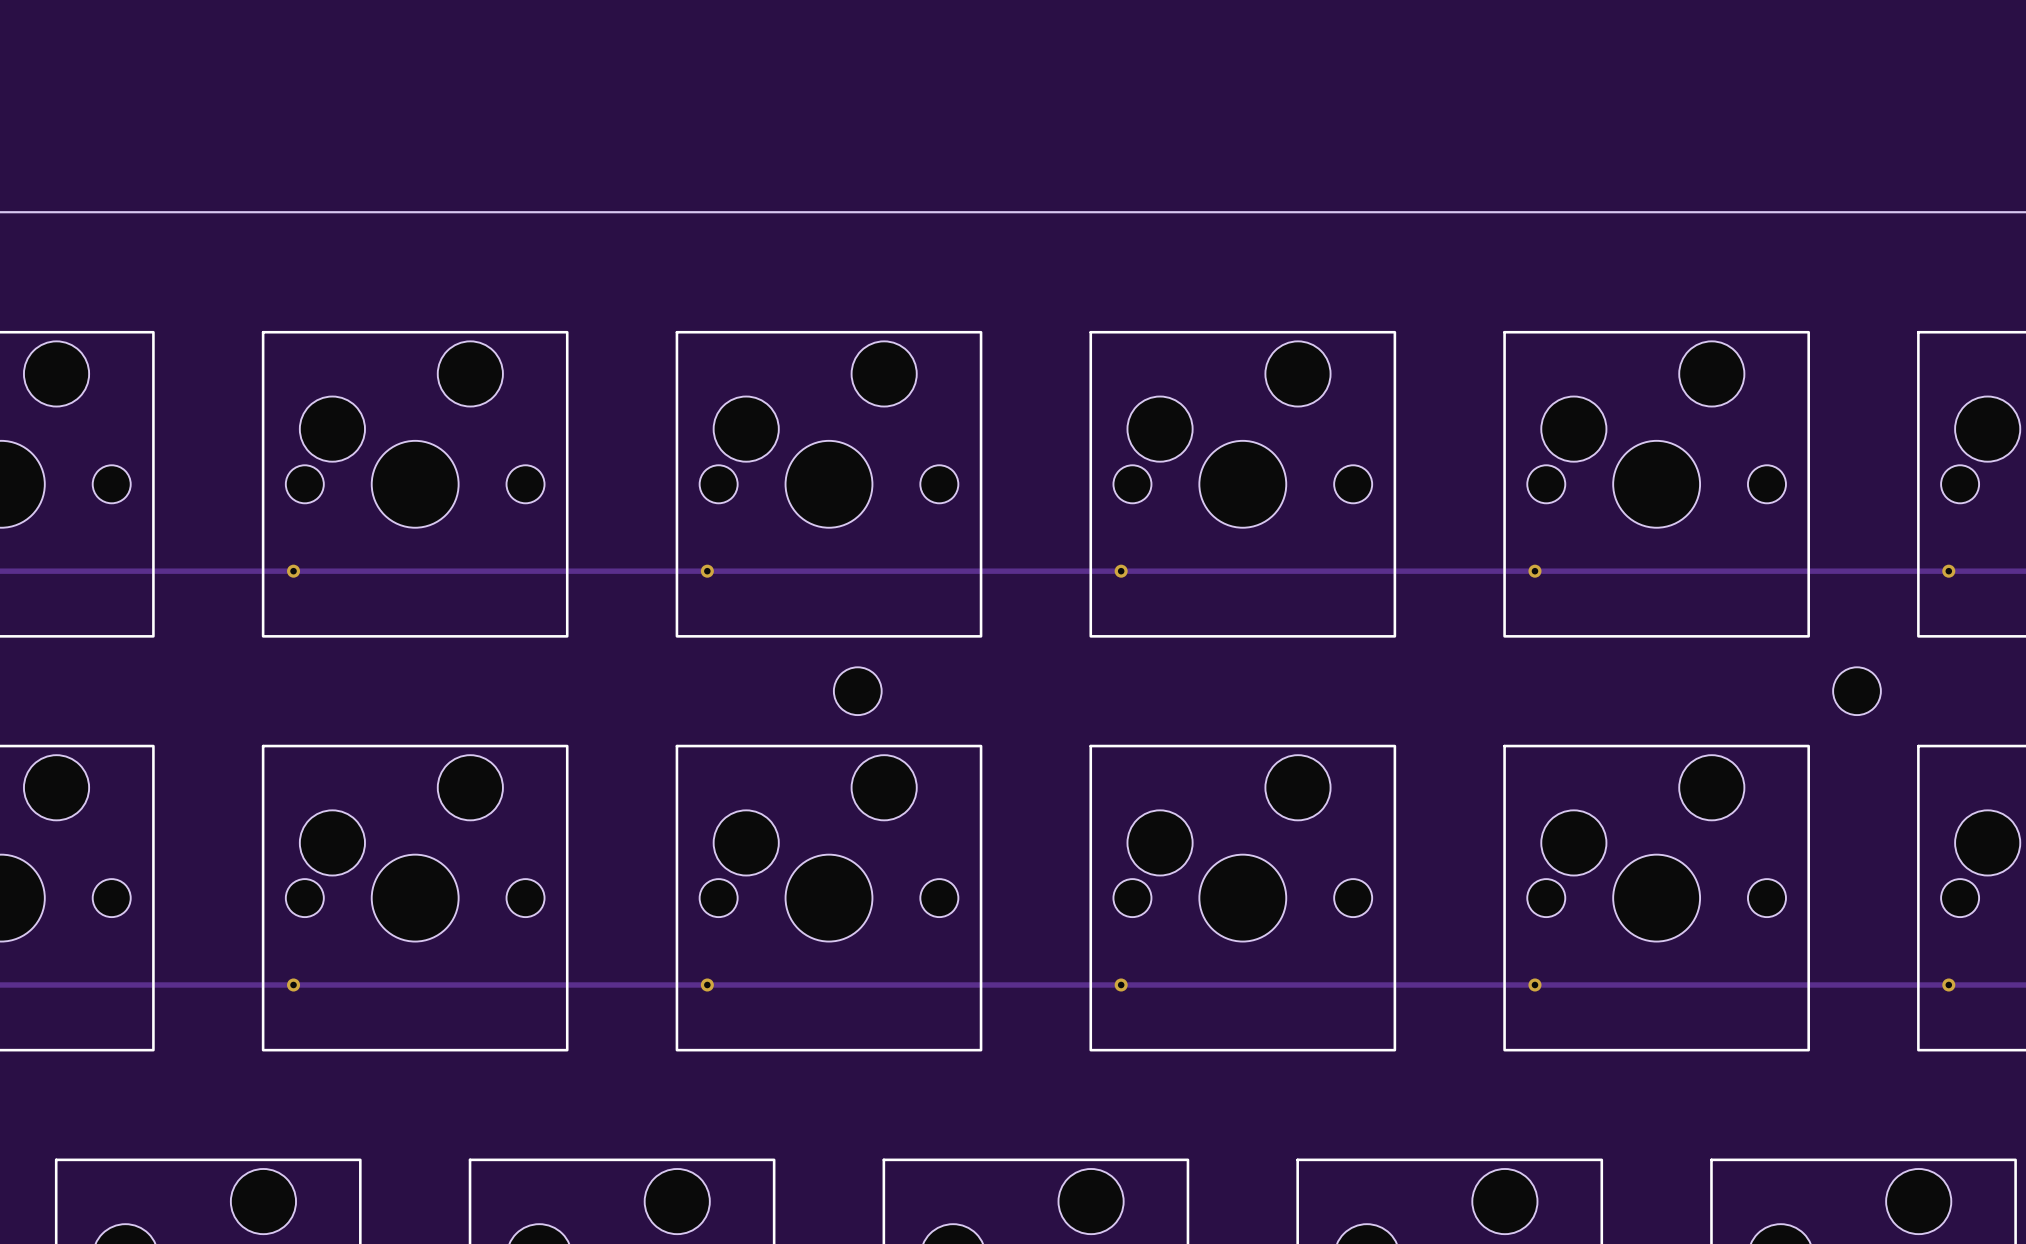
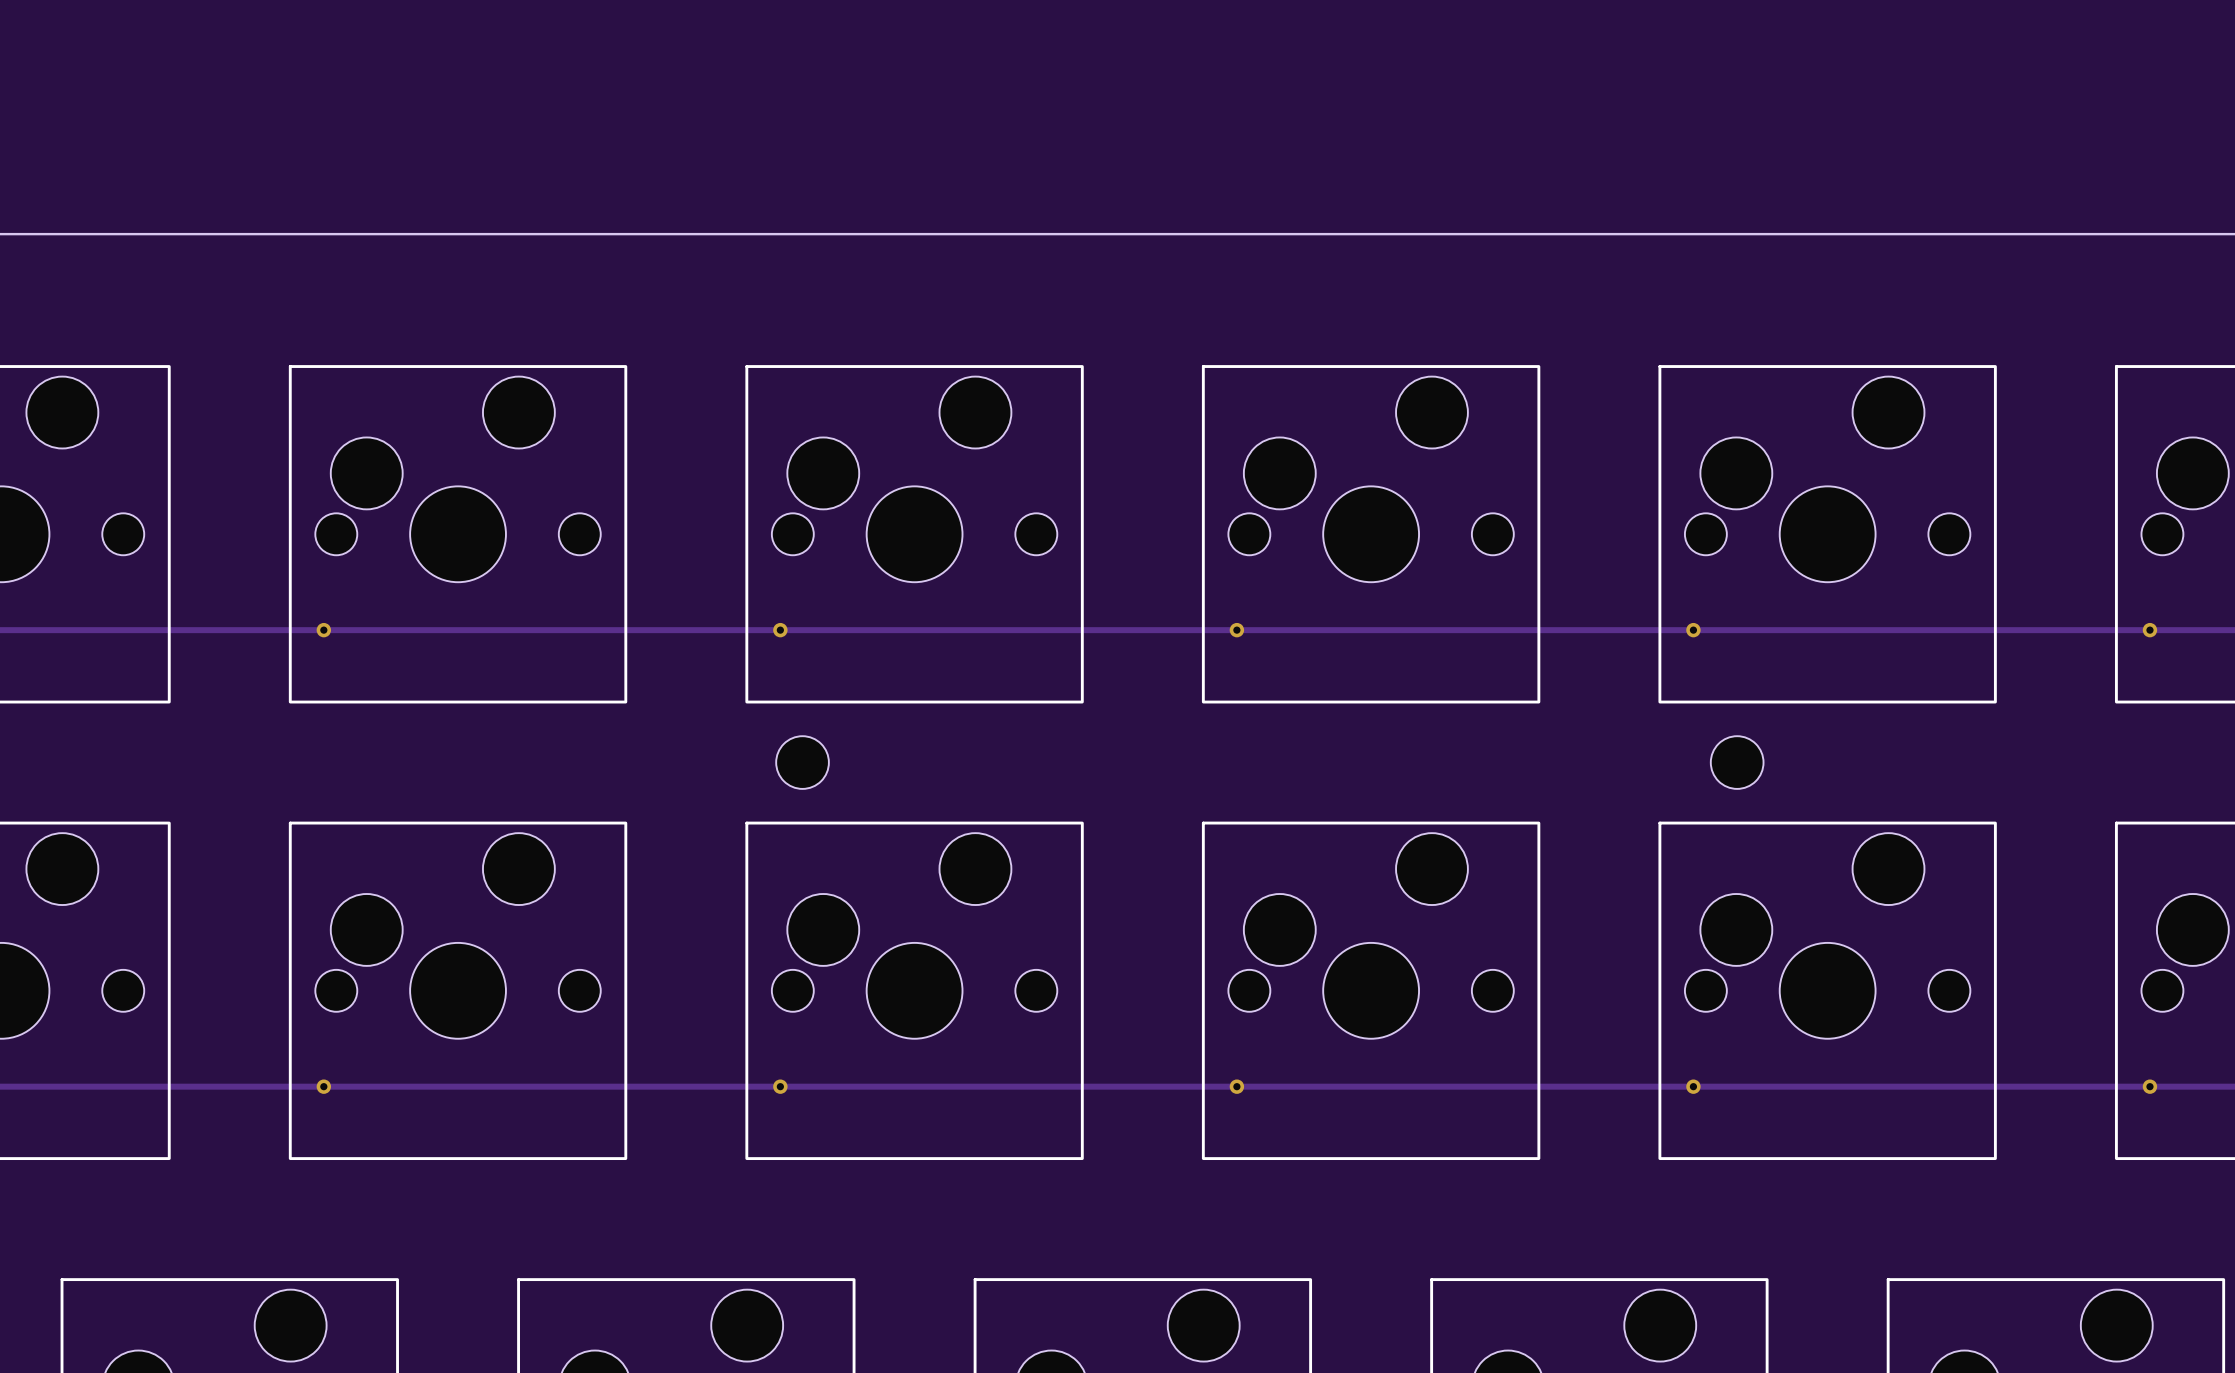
part position: (857, 691) -> (802, 762)
part position: (1857, 691) -> (1737, 762)

